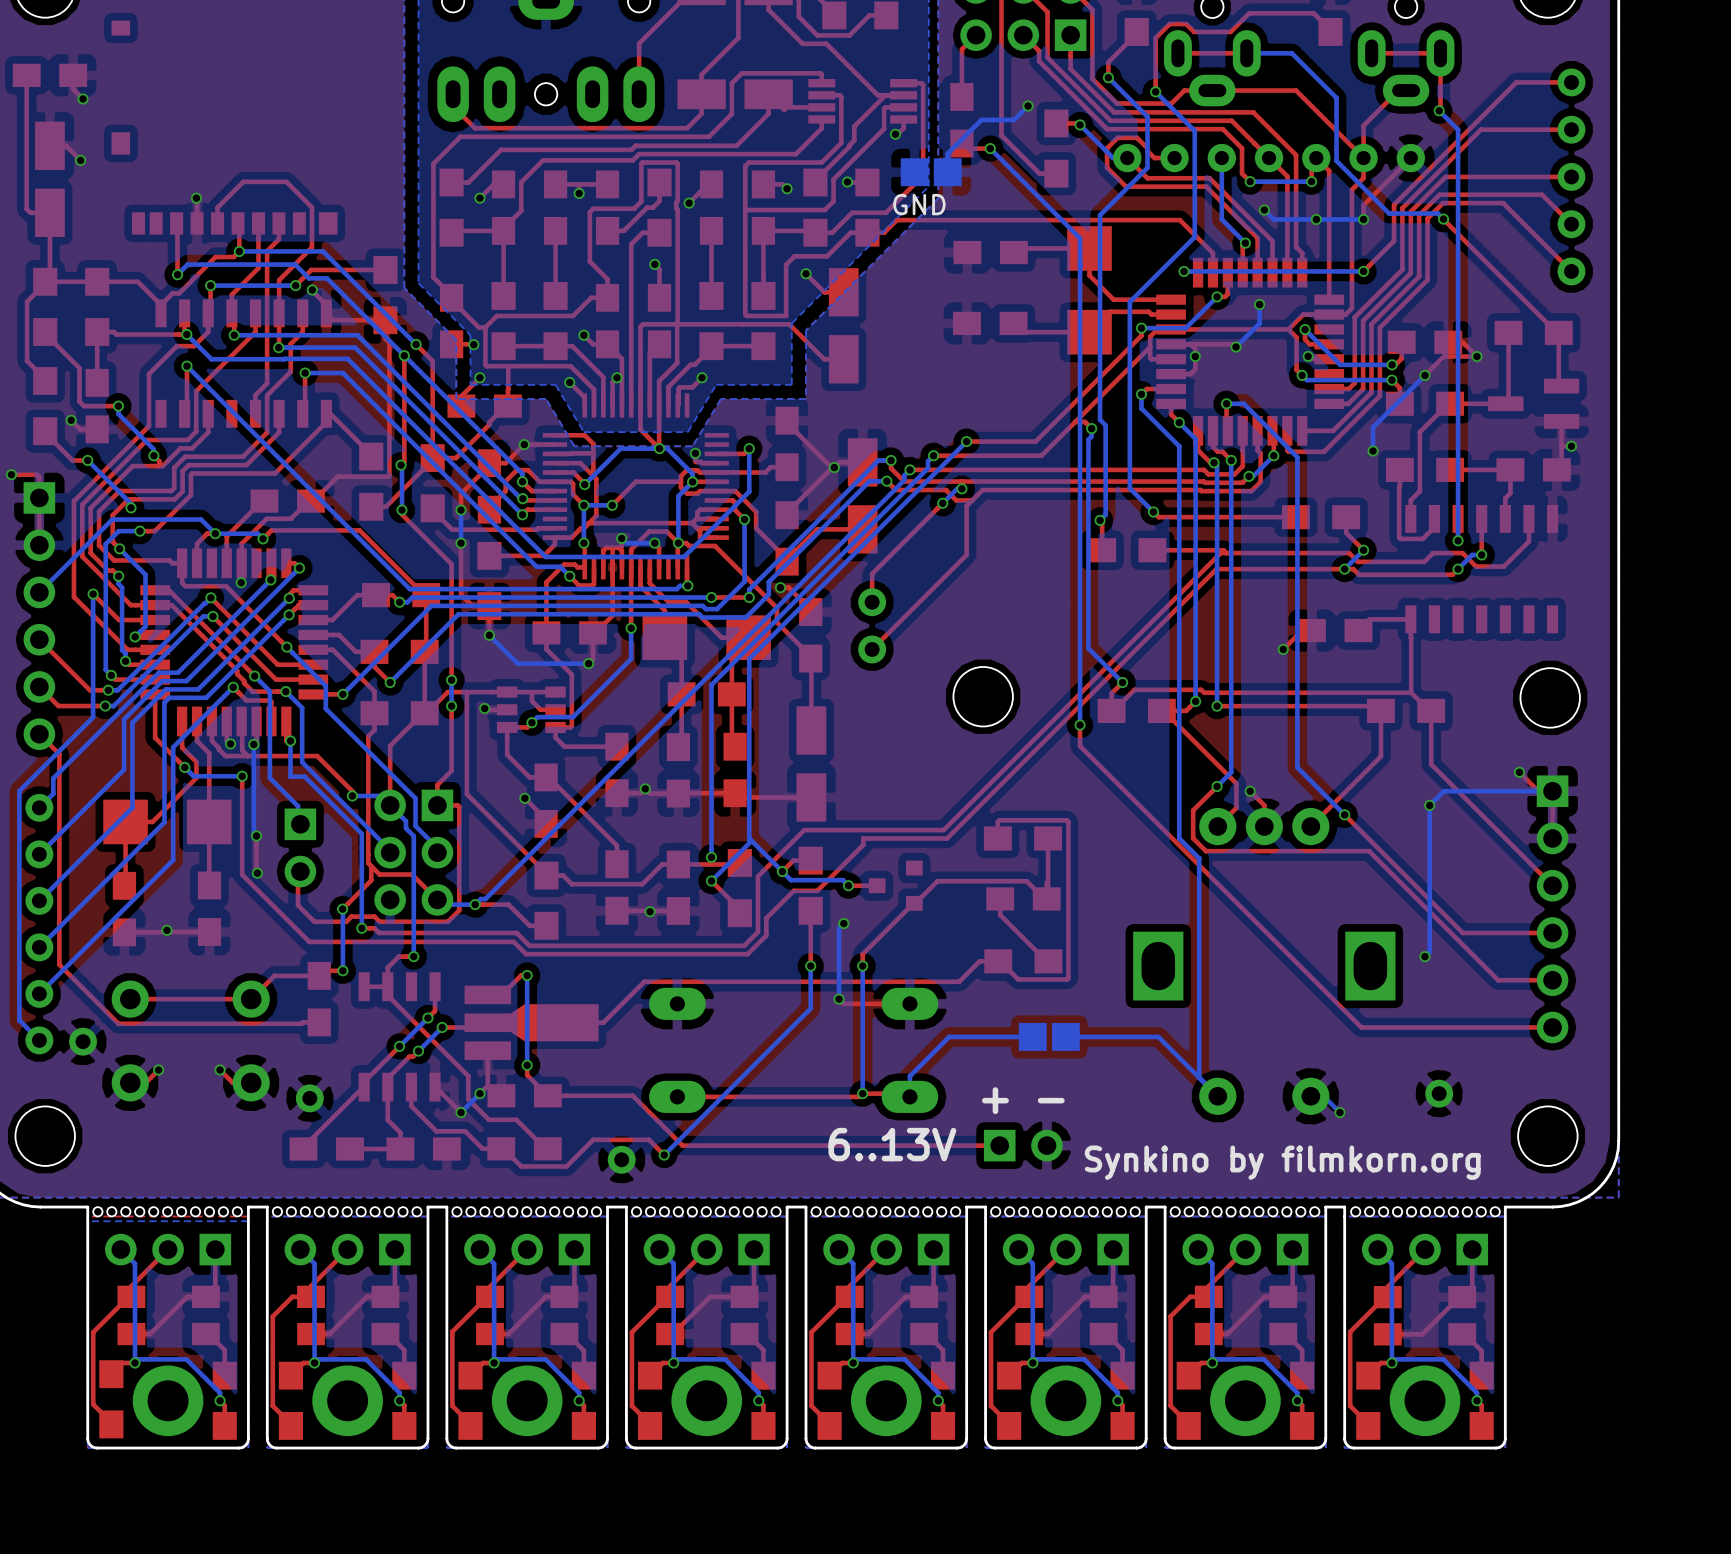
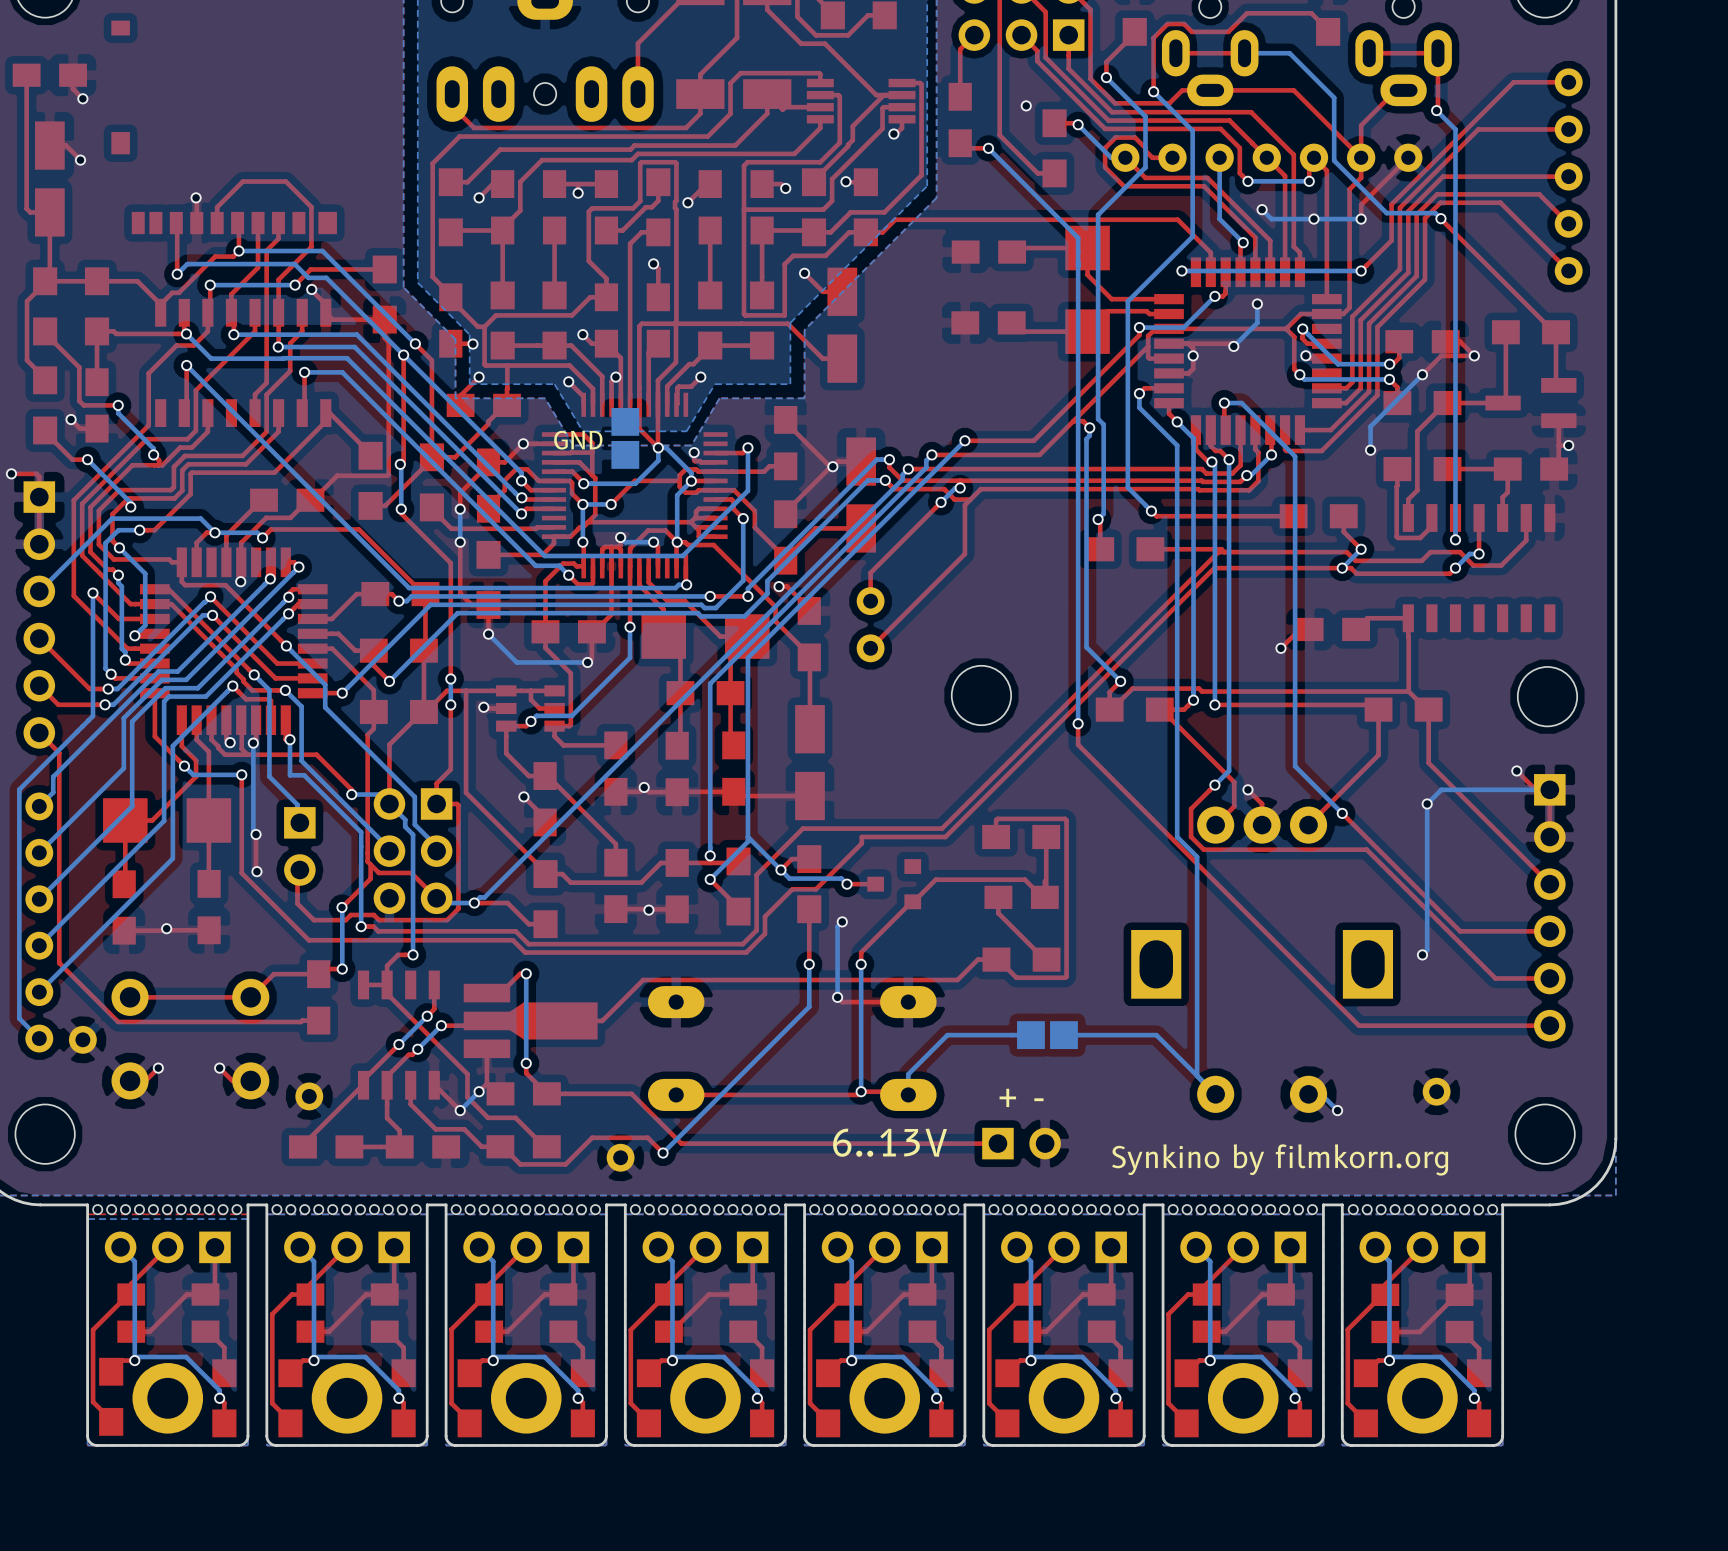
bottom track: (1028, 106) (1014, 119) (981, 119) (947, 153) (947, 172) -> none
part position: (914, 172) -> (625, 421)
GND position: (947, 172) -> (625, 454)
GND name position: GND (919, 204) -> GND (578, 440)
bottom track: (659, 448) (620, 448) (584, 484) -> (658, 447) (658, 460) (635, 483) (583, 483)

